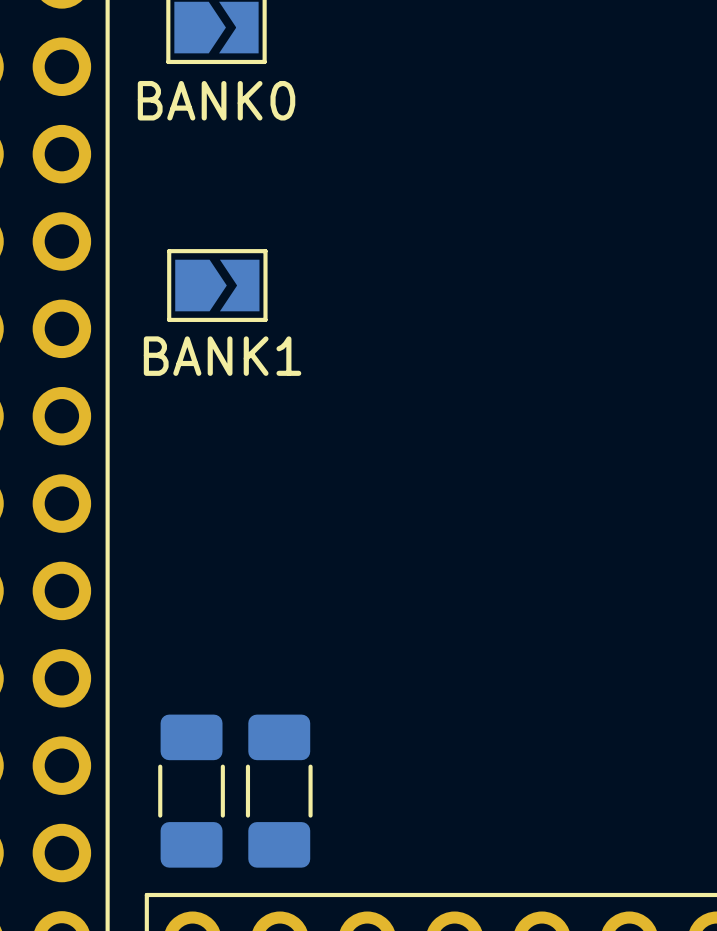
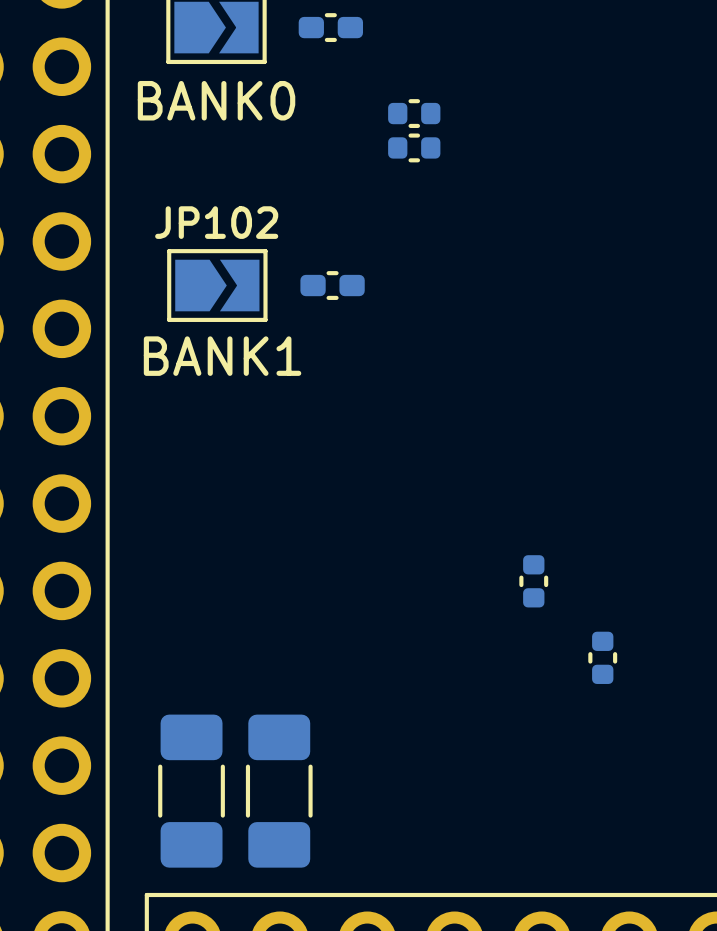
part: none -> (330, 27)
part: none -> (414, 113)
part: none -> (414, 147)
JP102 name: none -> JP102 (216, 222)
part: none -> (332, 285)
part: none -> (533, 581)
part: none -> (602, 657)

